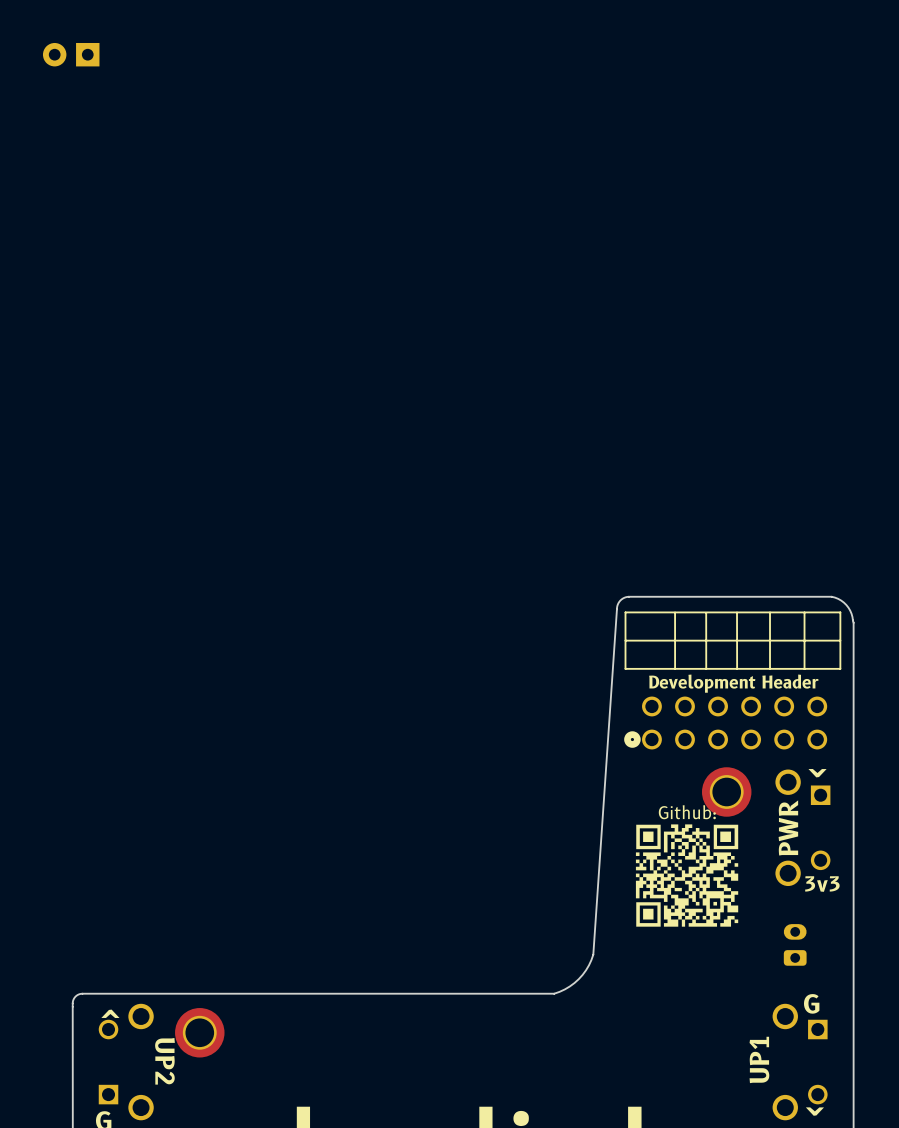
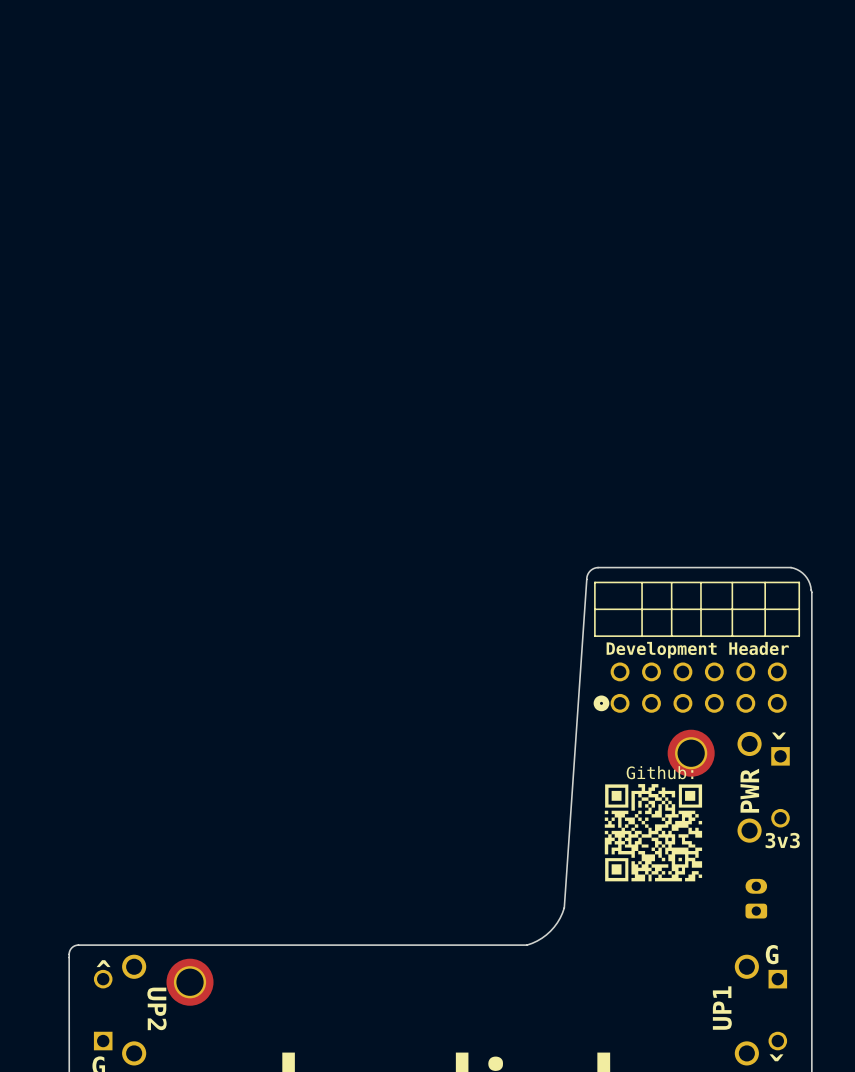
part: (71, 54) -> none

